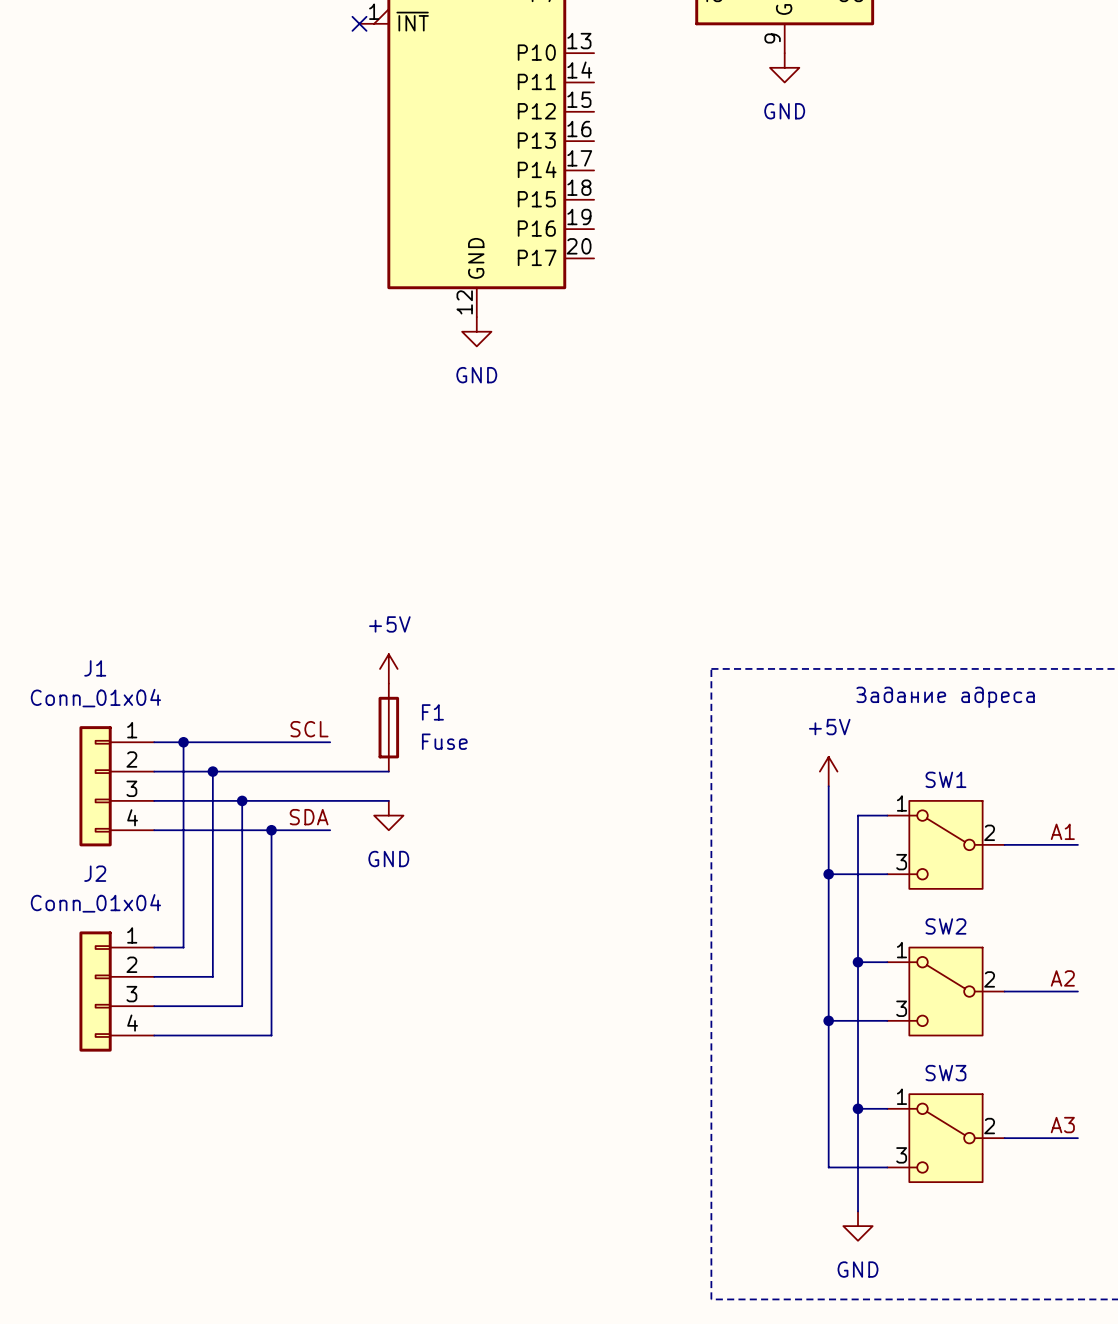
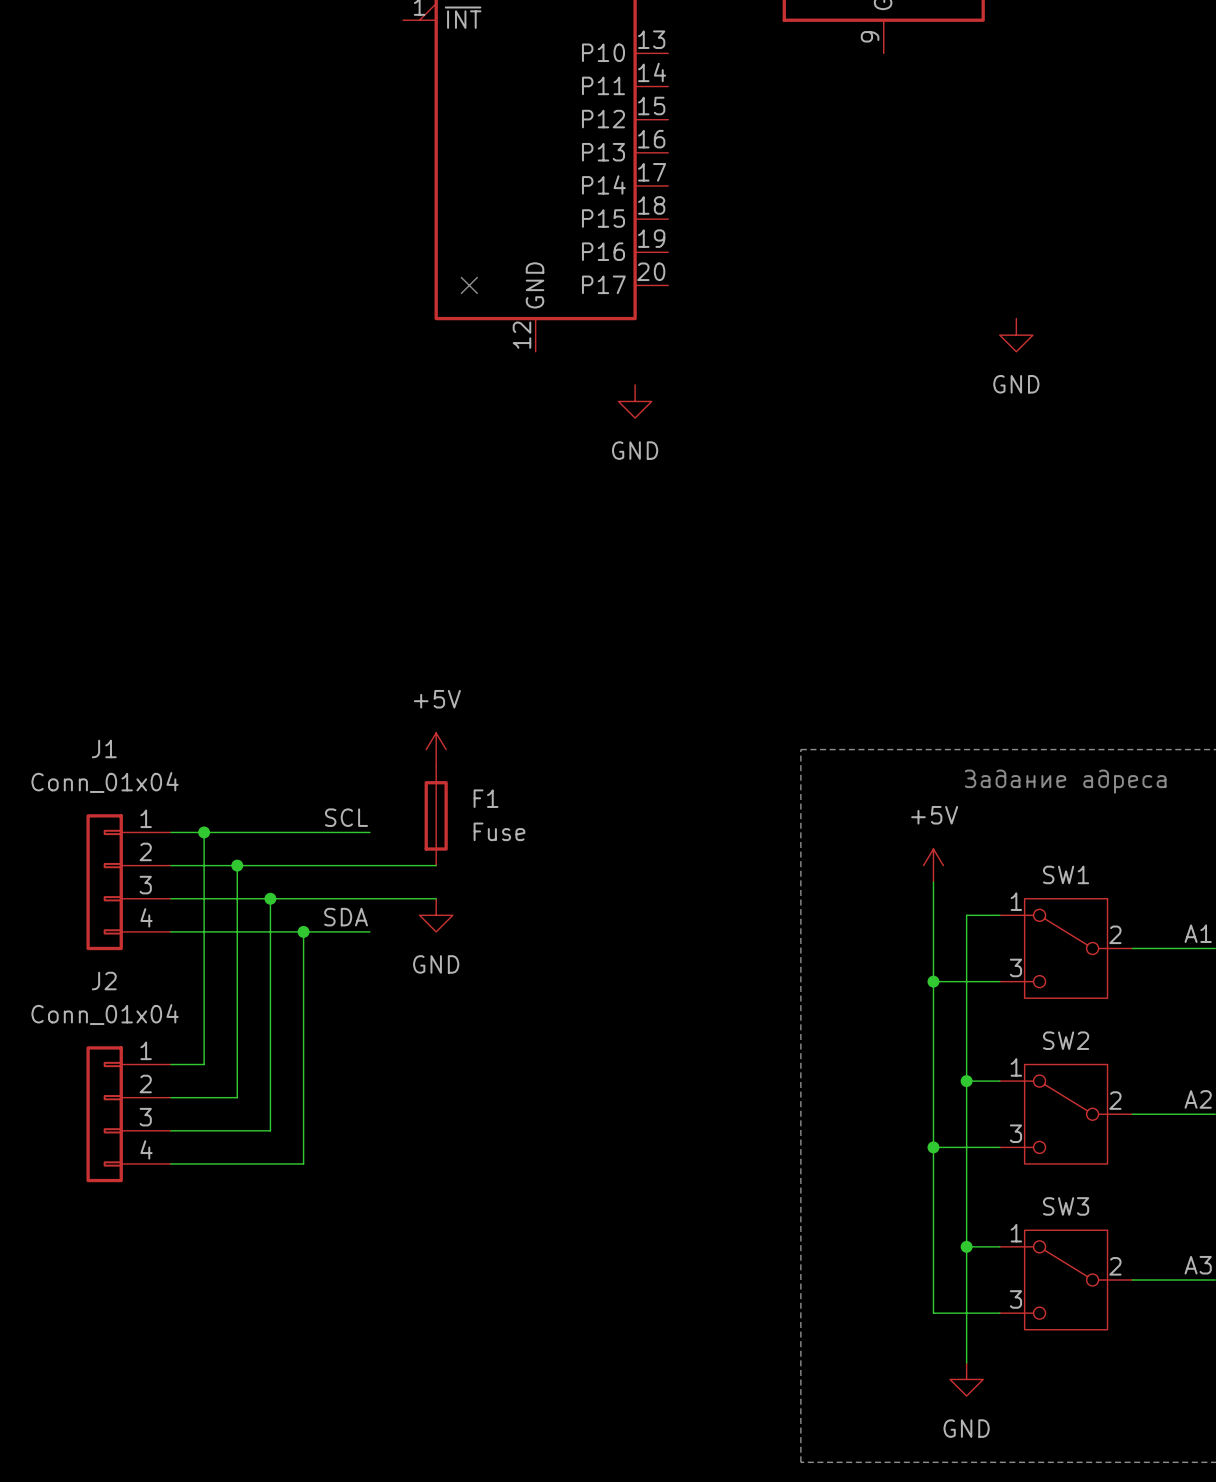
no-connect mark: (359, 23) -> none
power symbol: GND (784, 67) -> none
no-connect mark: none -> (469, 285)
power symbol: none -> GND (1016, 335)
power symbol position: GND (476, 331) -> GND (635, 401)

